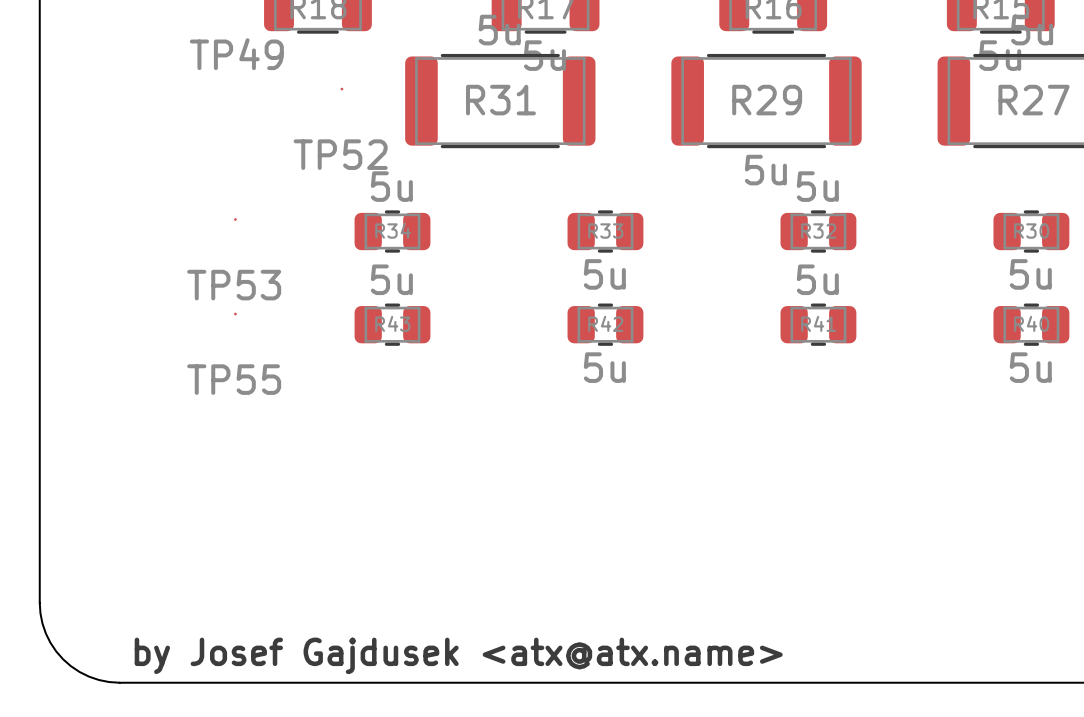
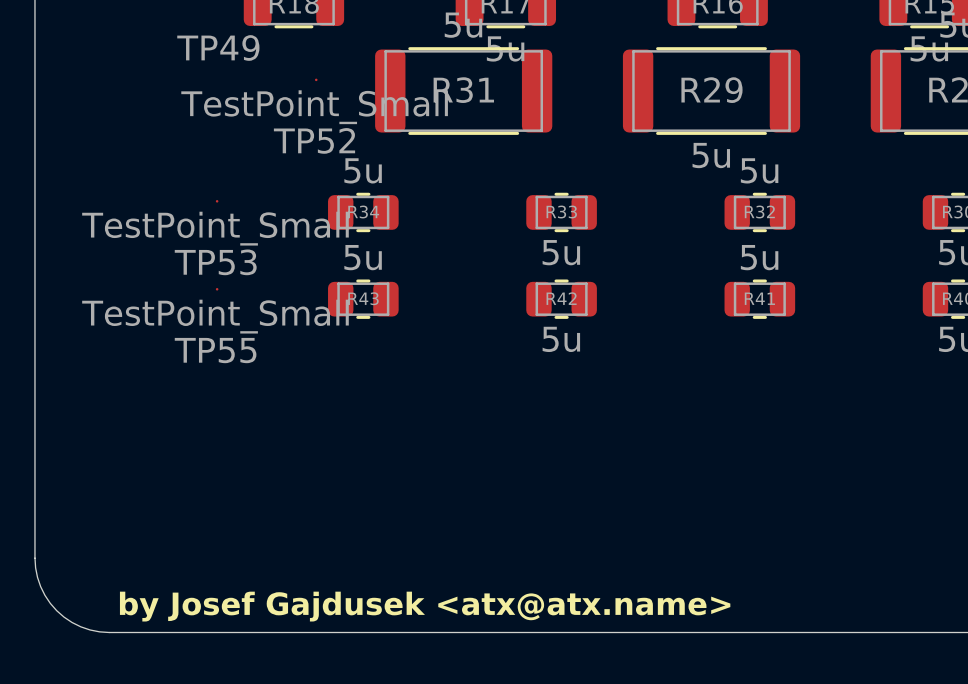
TP52 value: none -> TestPoint_Small (314, 107)
TP53 value: none -> TestPoint_Small (215, 228)
TP55 value: none -> TestPoint_Small (215, 316)

